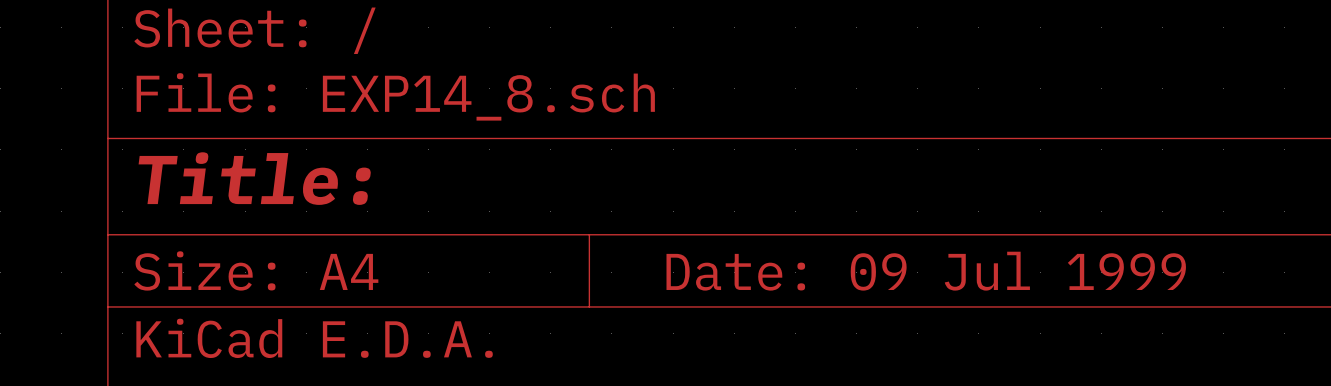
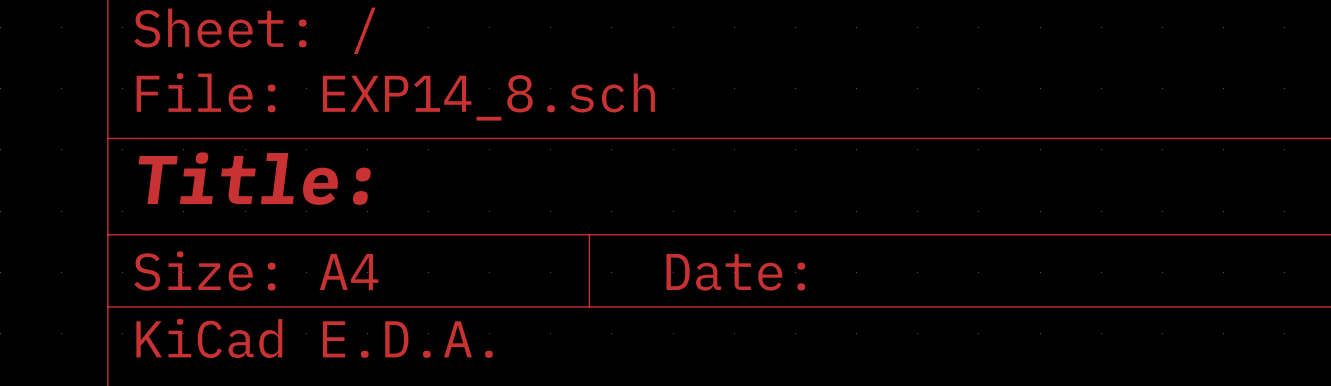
title block: Date: 09 Jul 1999 (926, 271) -> Date: (735, 272)

